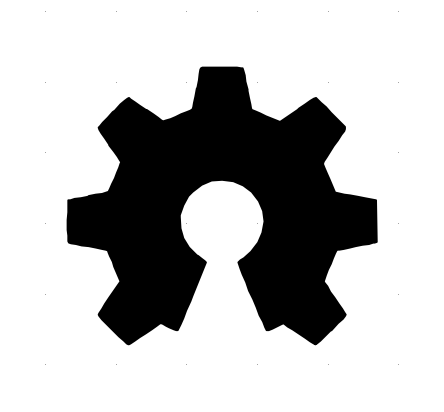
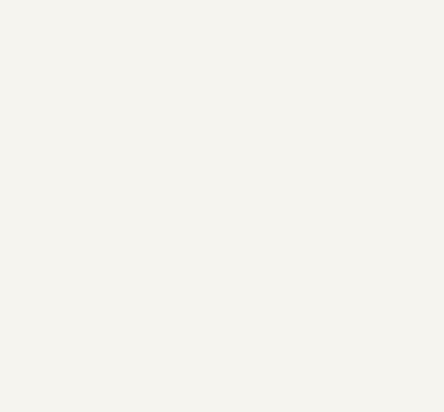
power symbol: (222, 205) -> none

